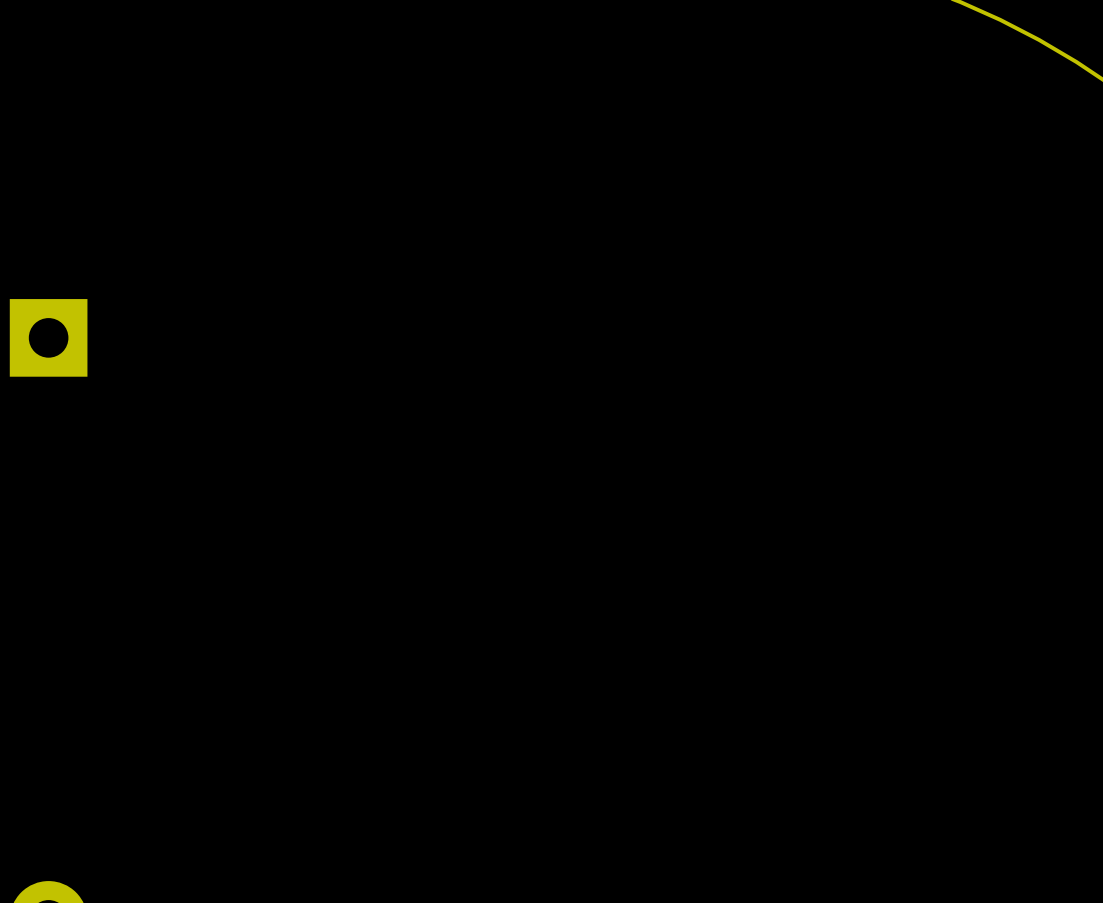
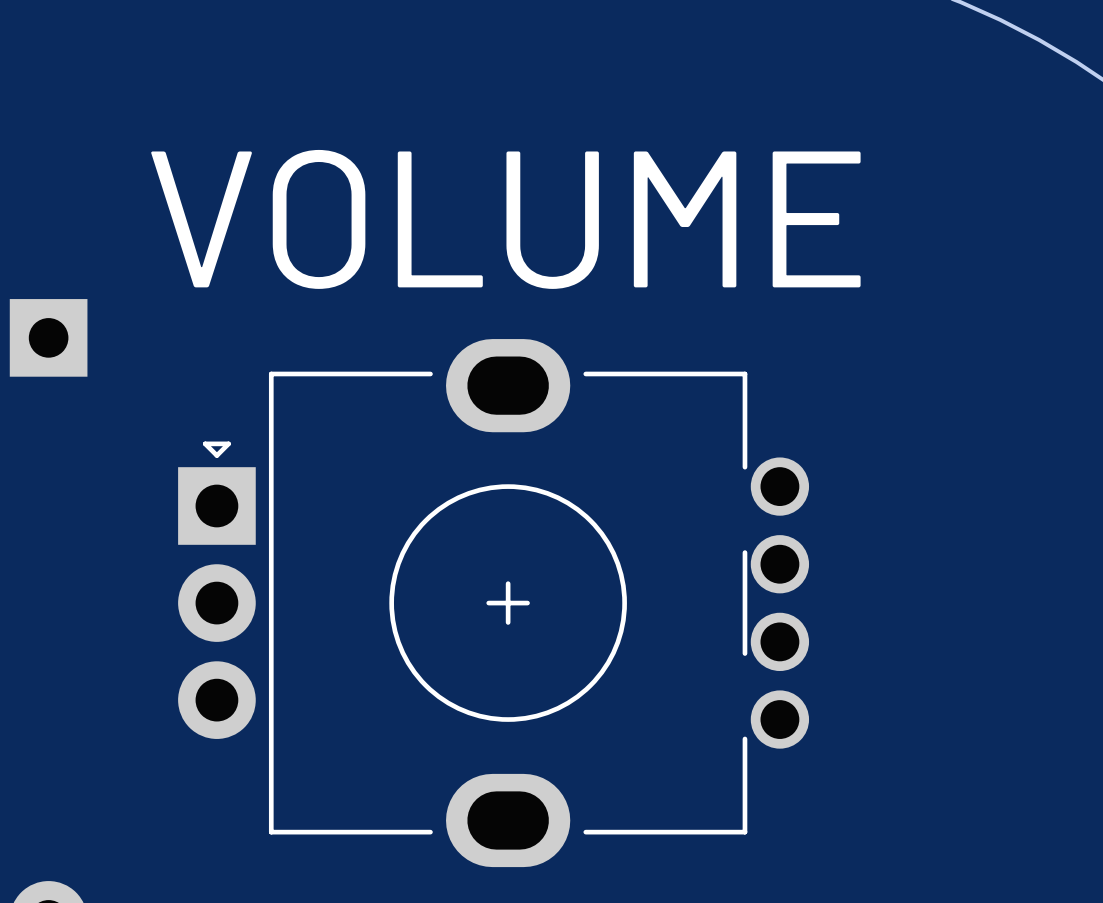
text: none -> VOLUME (505, 219)
part: none -> (493, 603)

